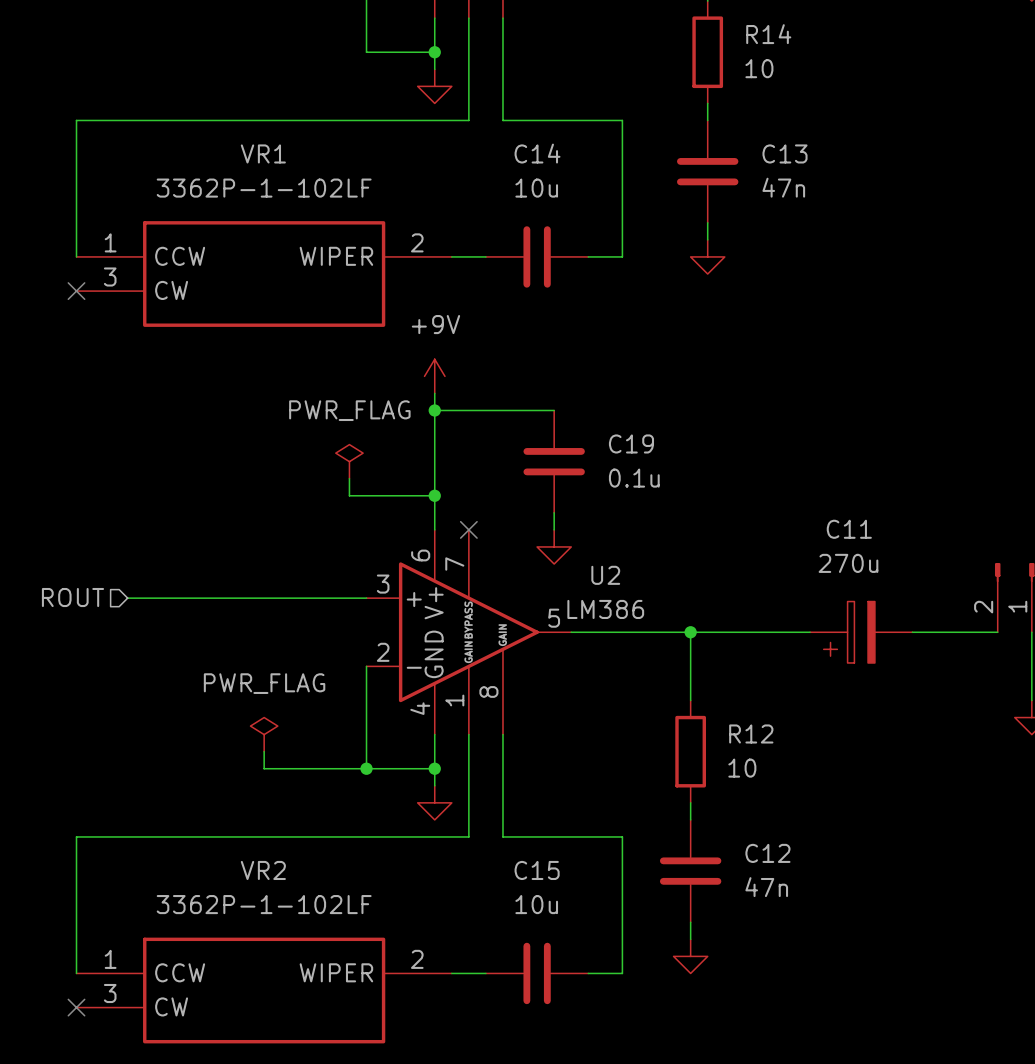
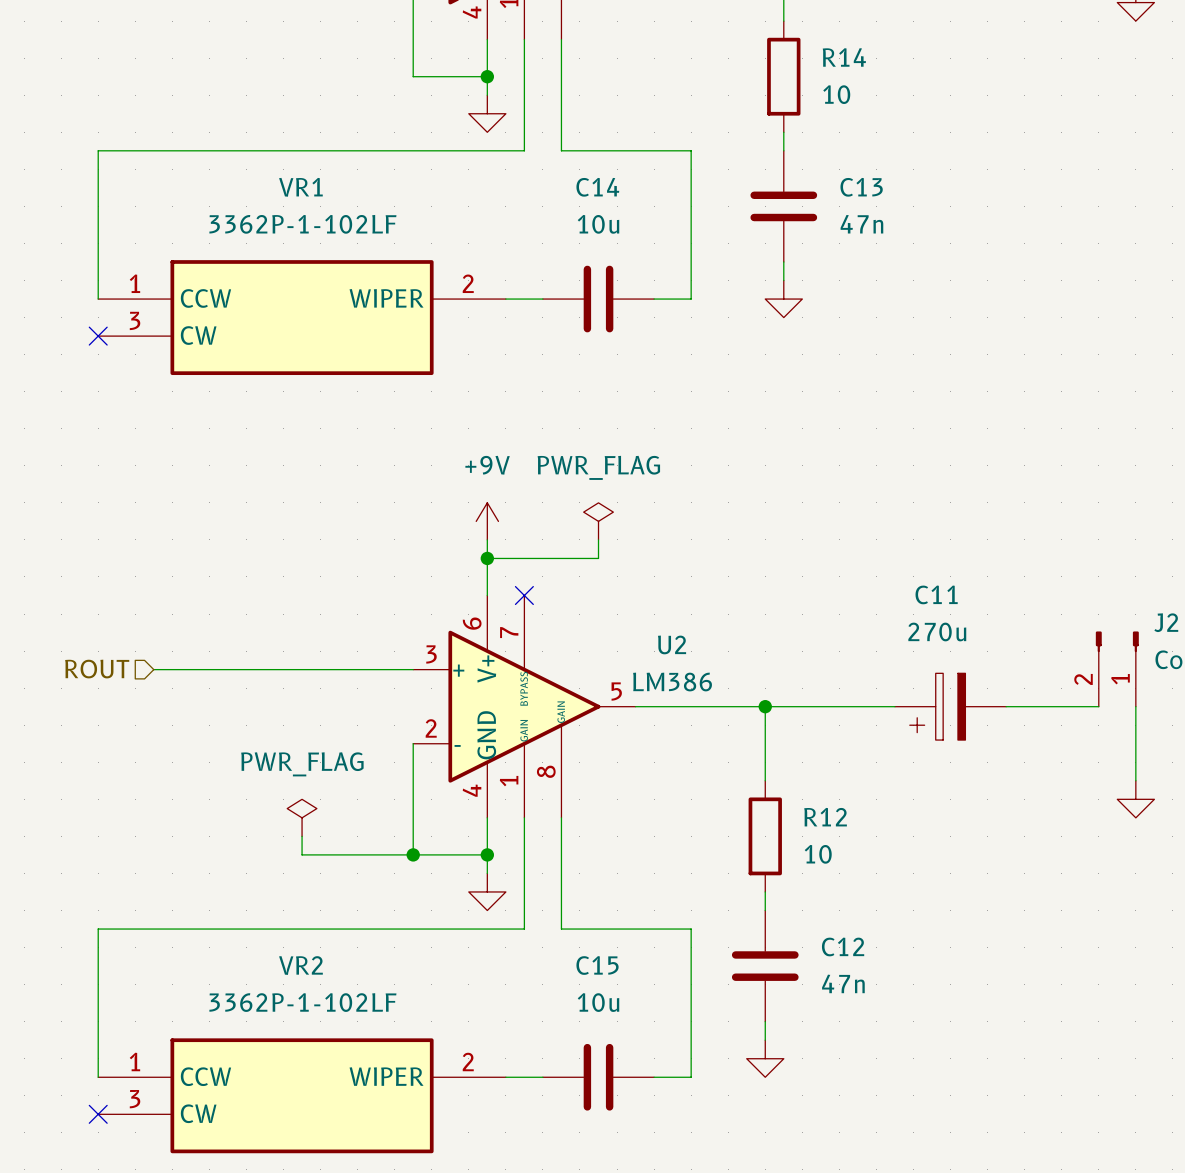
power symbol position: +9V (434, 376) -> +9V (487, 521)
wire: (434, 393) (434, 478) -> none
wire: (434, 410) (554, 410) -> none
junction: (434, 410) -> none
power symbol position: PWR_FLAG (349, 461) -> PWR_FLAG (598, 521)
C19: 0.1u (554, 461) -> none
wire: (349, 478) (349, 495) (434, 495) -> (598, 539) (598, 558) (487, 558)
wire: (554, 512) (554, 529) -> none
power symbol: (554, 546) -> none

